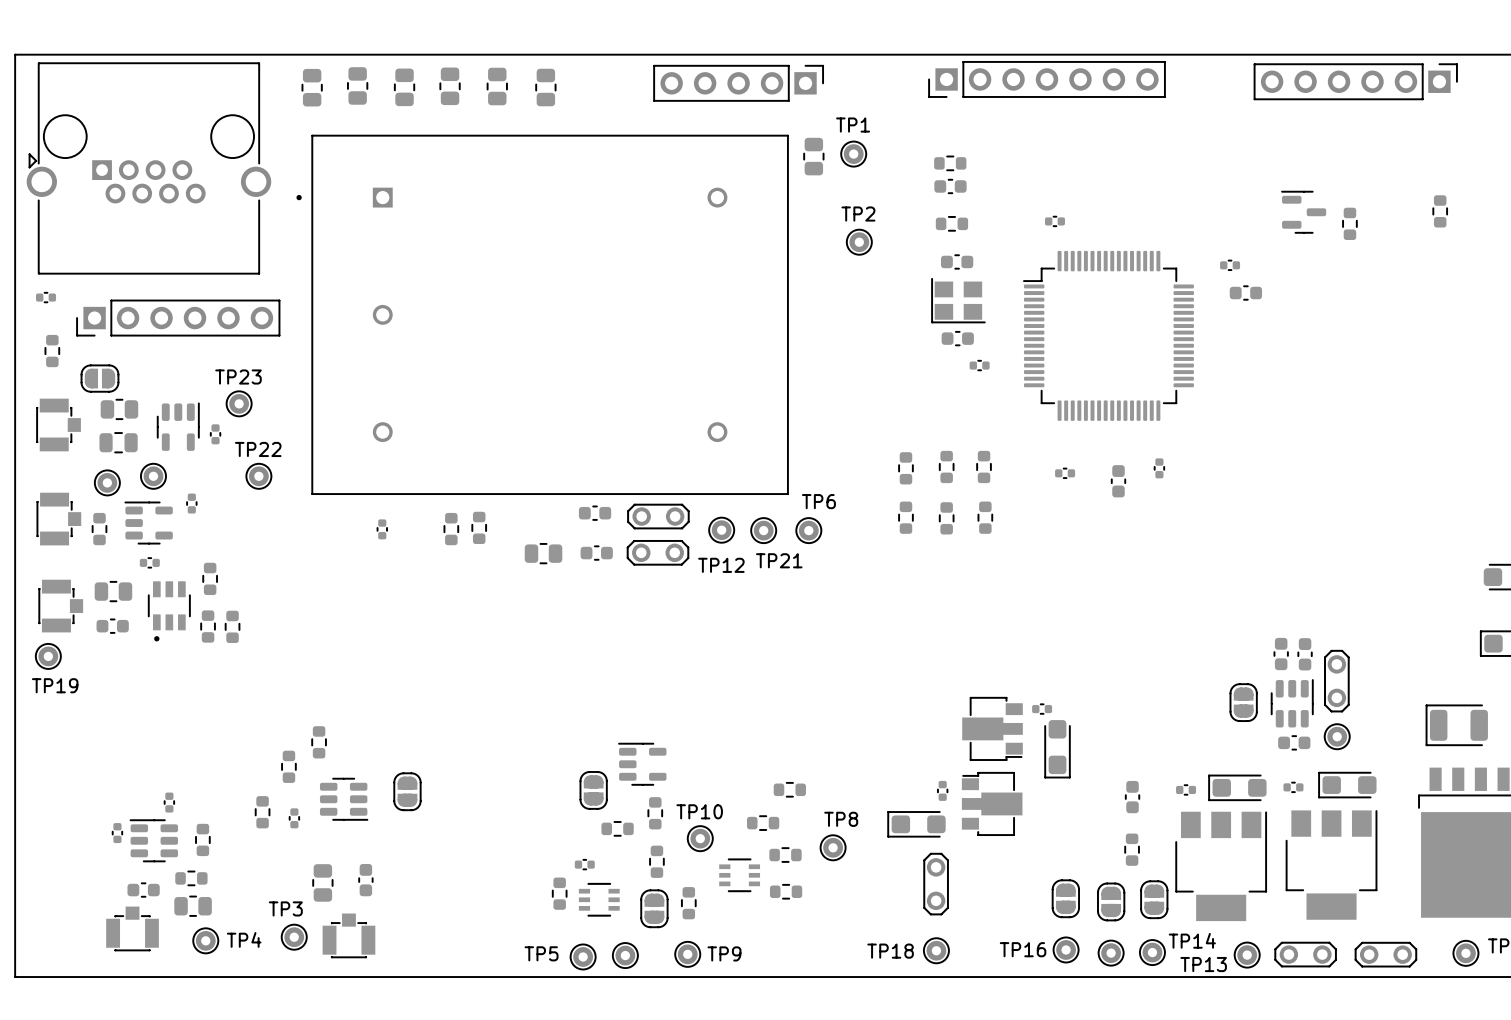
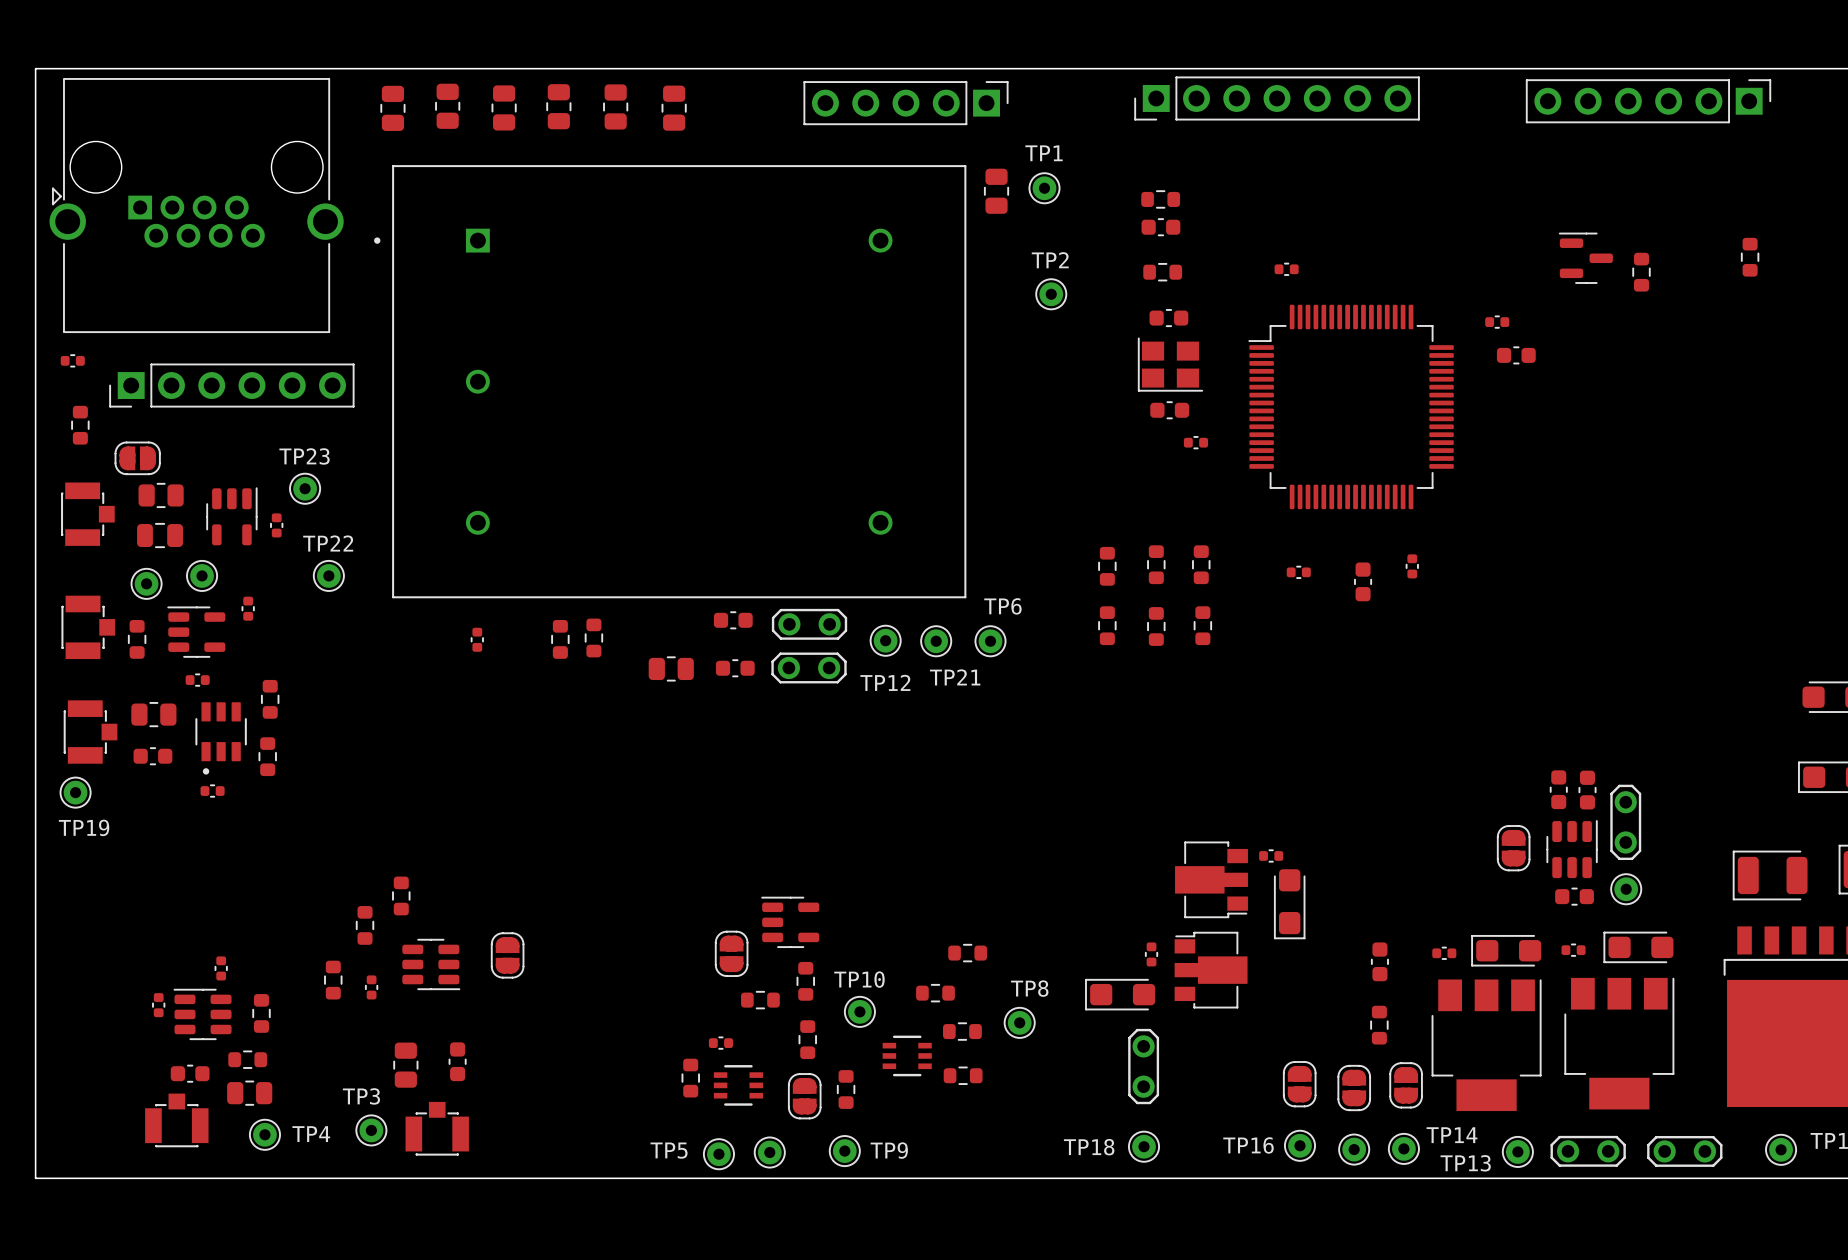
part: (232, 626) -> none
part: none -> (212, 791)

